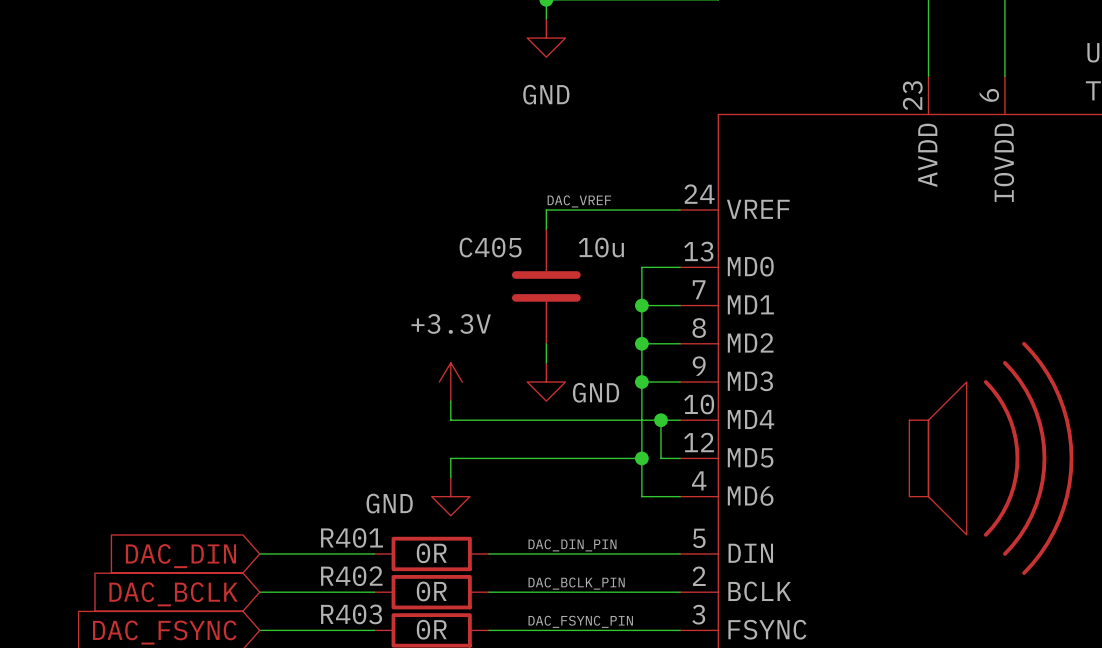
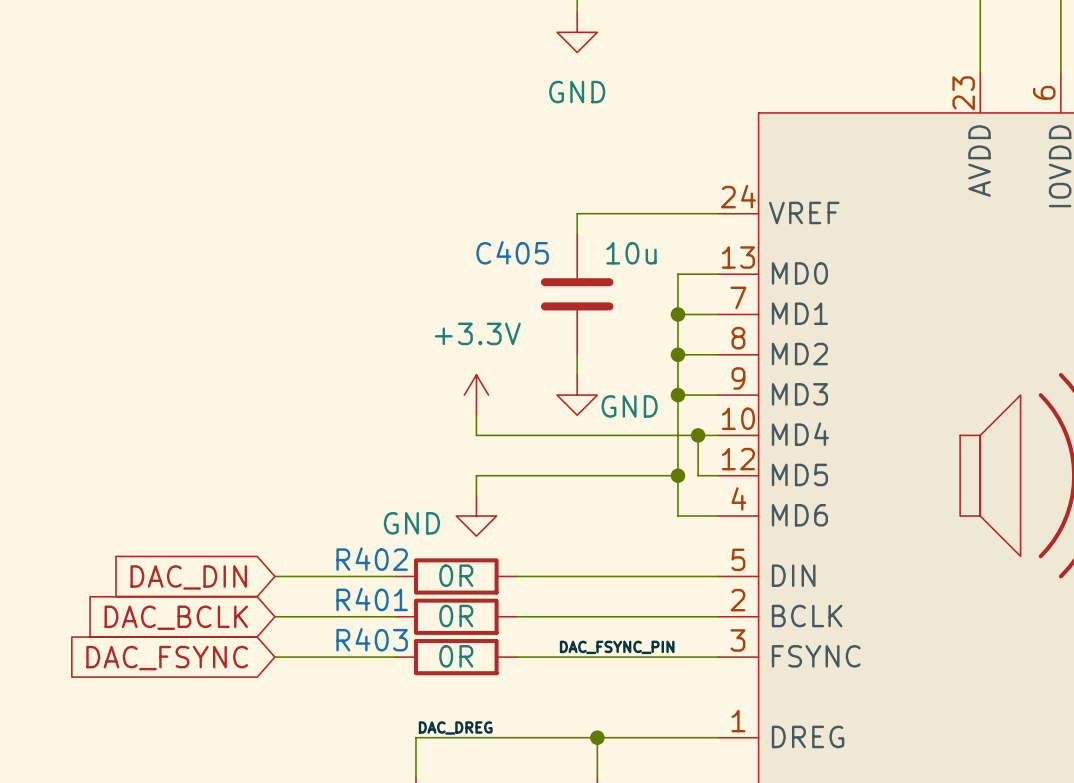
label: DAC_VREF (579, 201) -> none
R401 name: R401 (352, 537) -> R402 (372, 559)
label: DAC_DIN_PIN (572, 545) -> none
R402 name: R402 (351, 576) -> R401 (372, 599)
label: DAC_BCLK_PIN (576, 583) -> none

